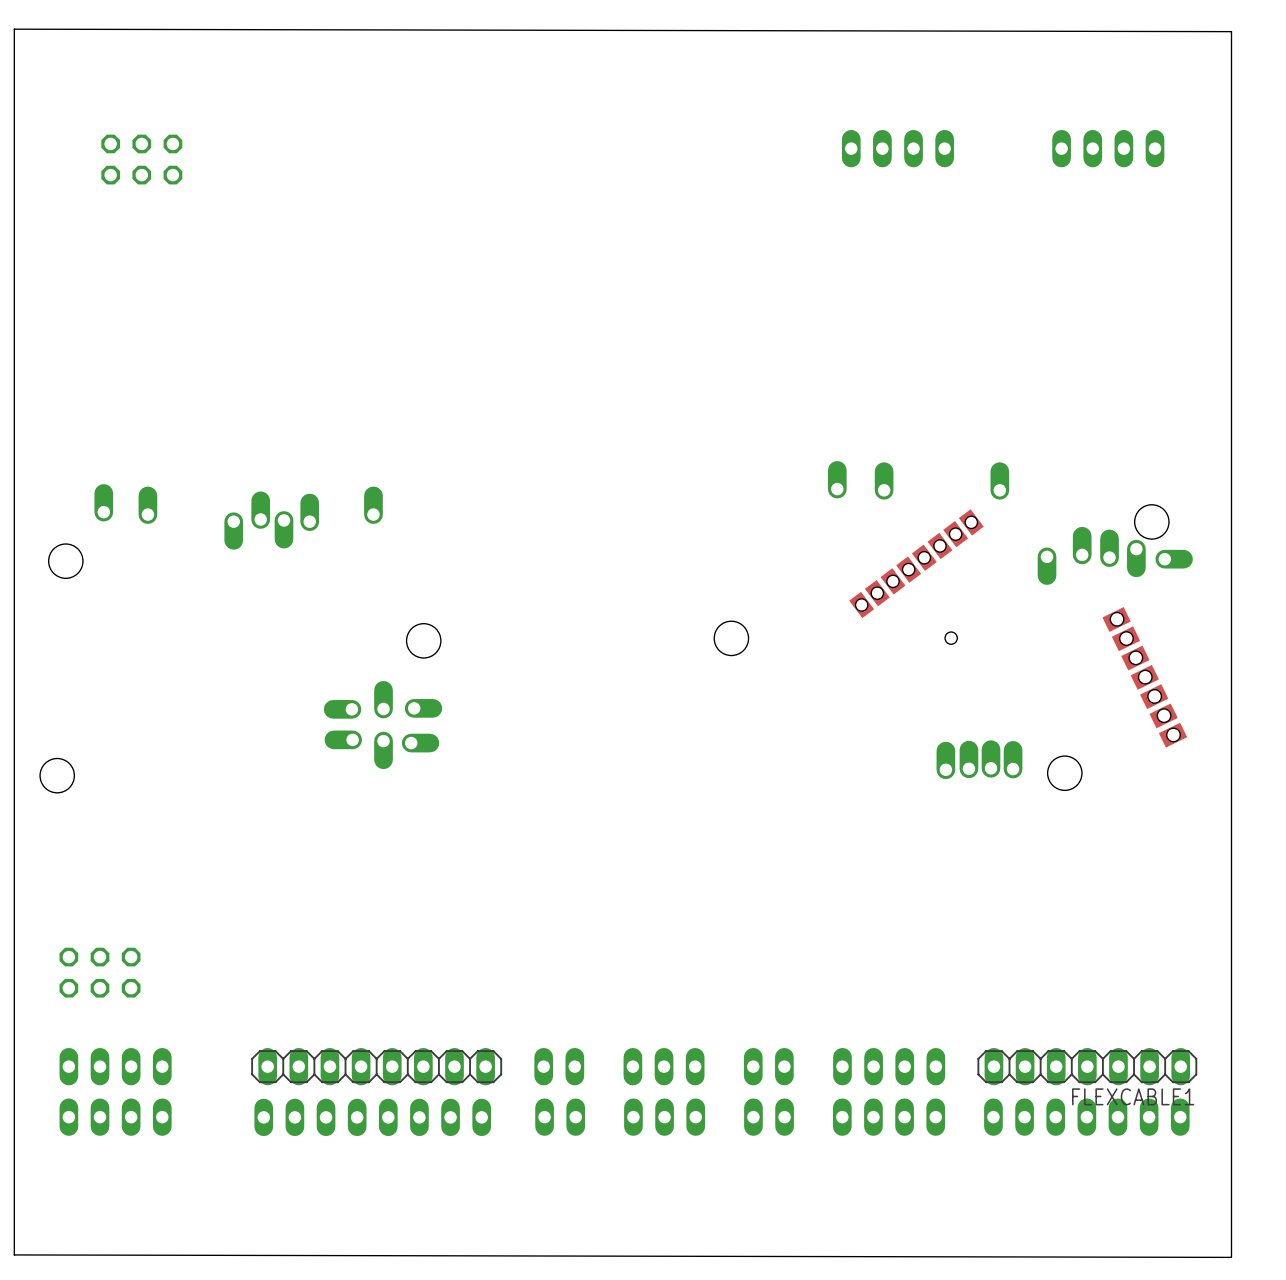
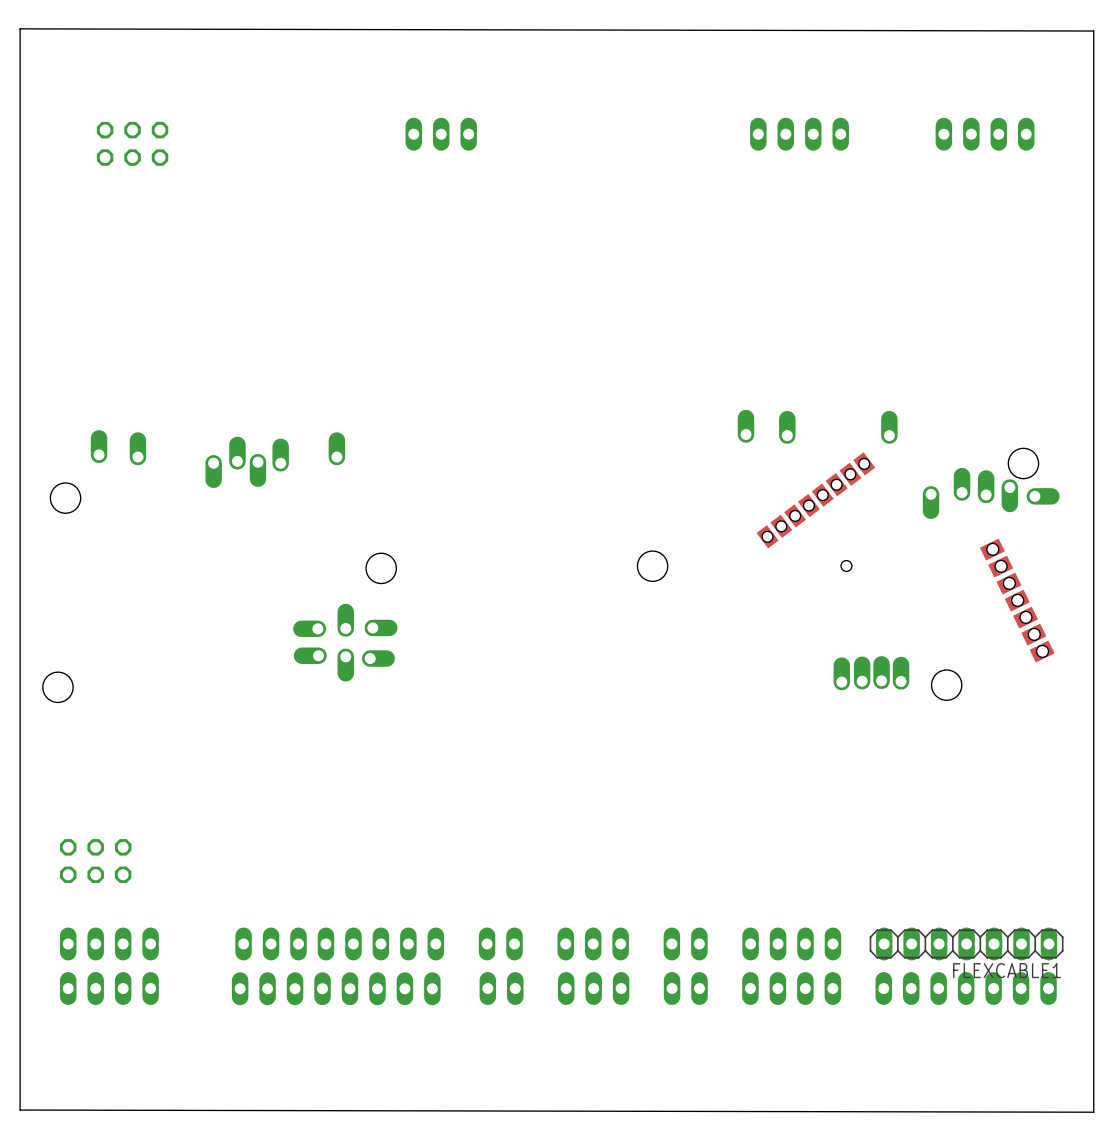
part: none -> (441, 134)
part side: bottom (376, 1066) -> top (339, 943)

